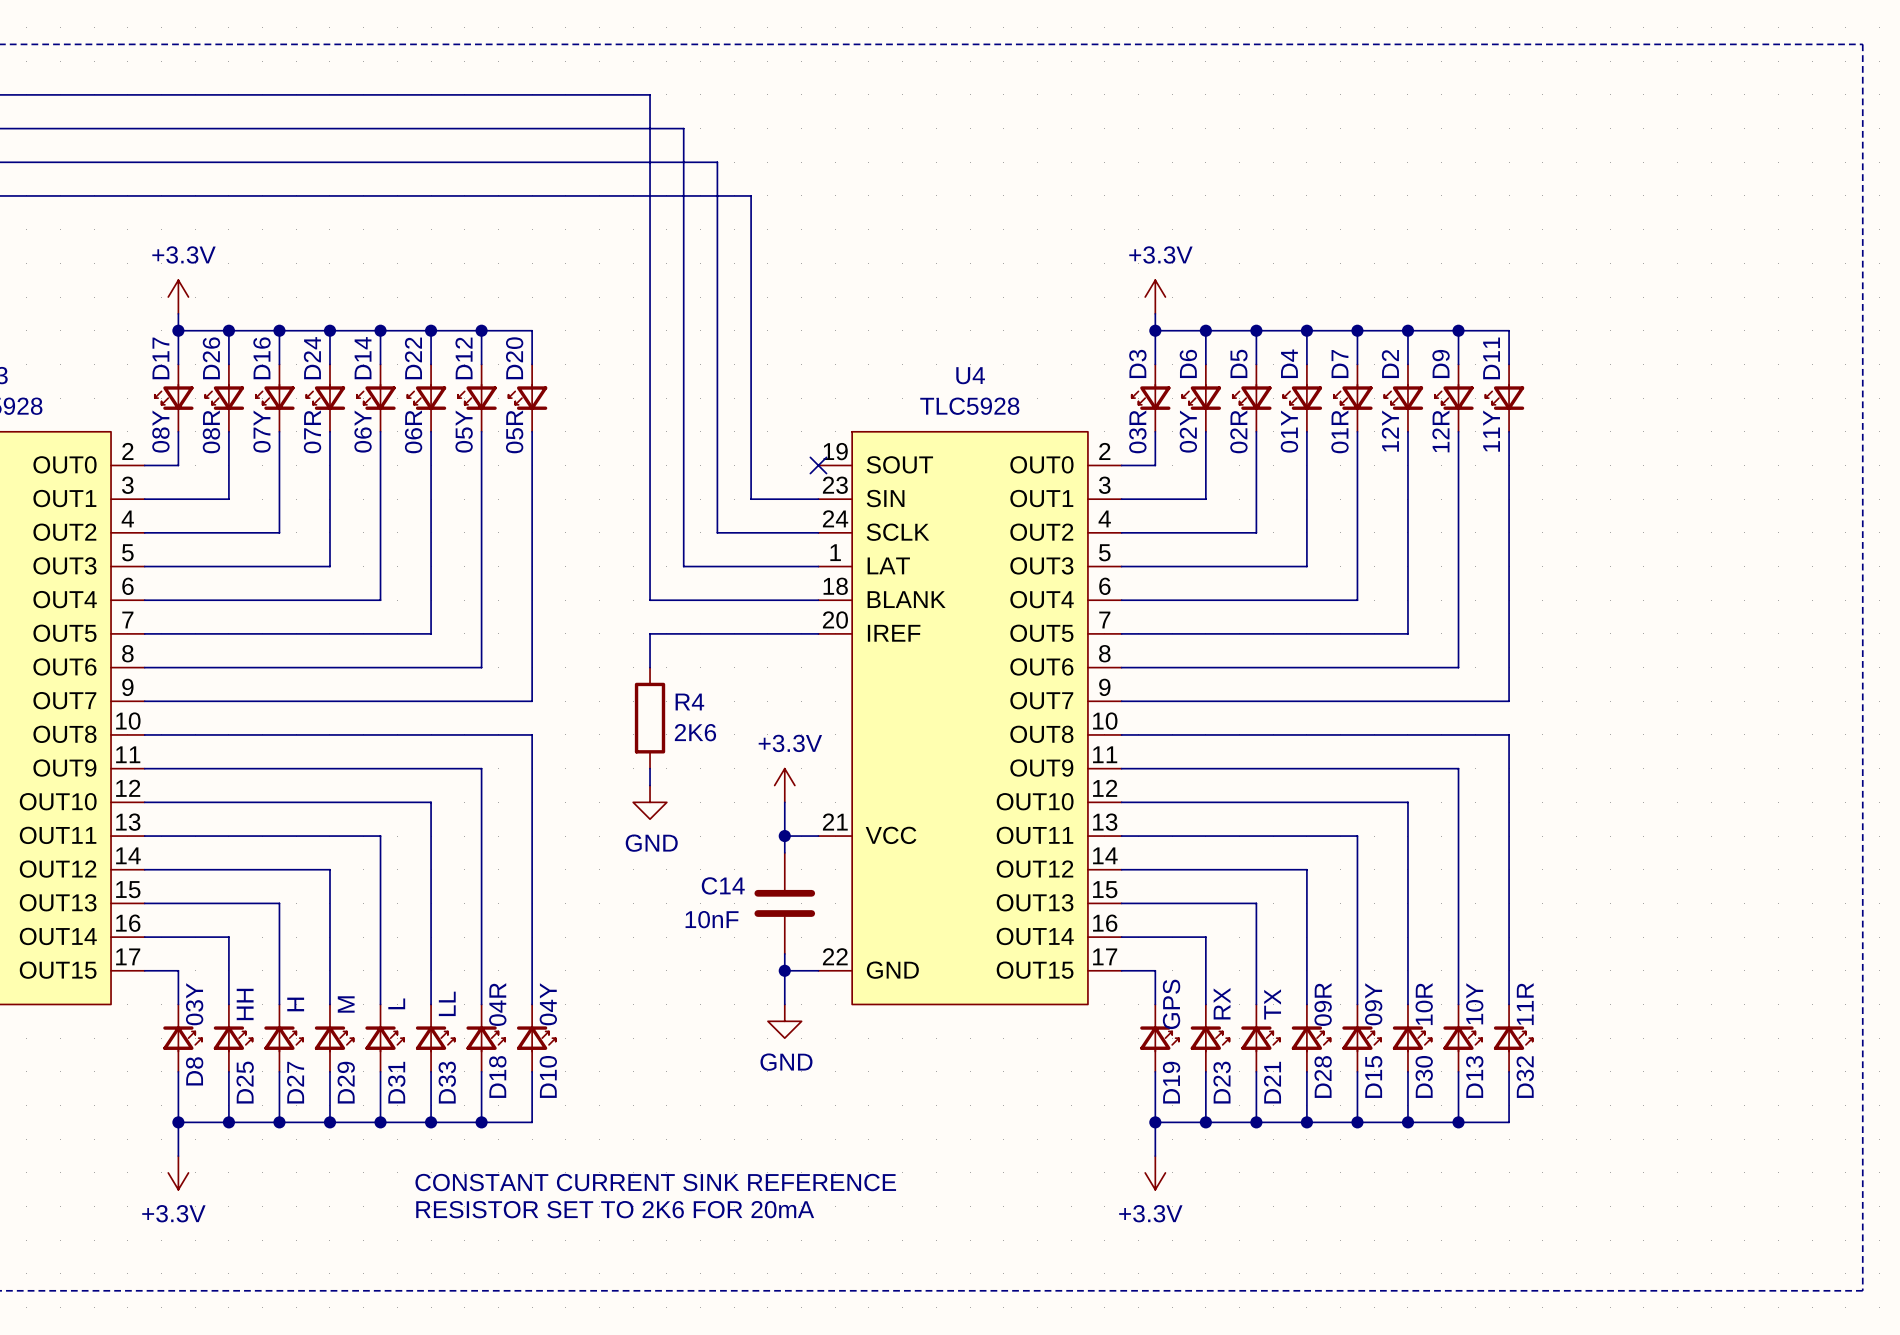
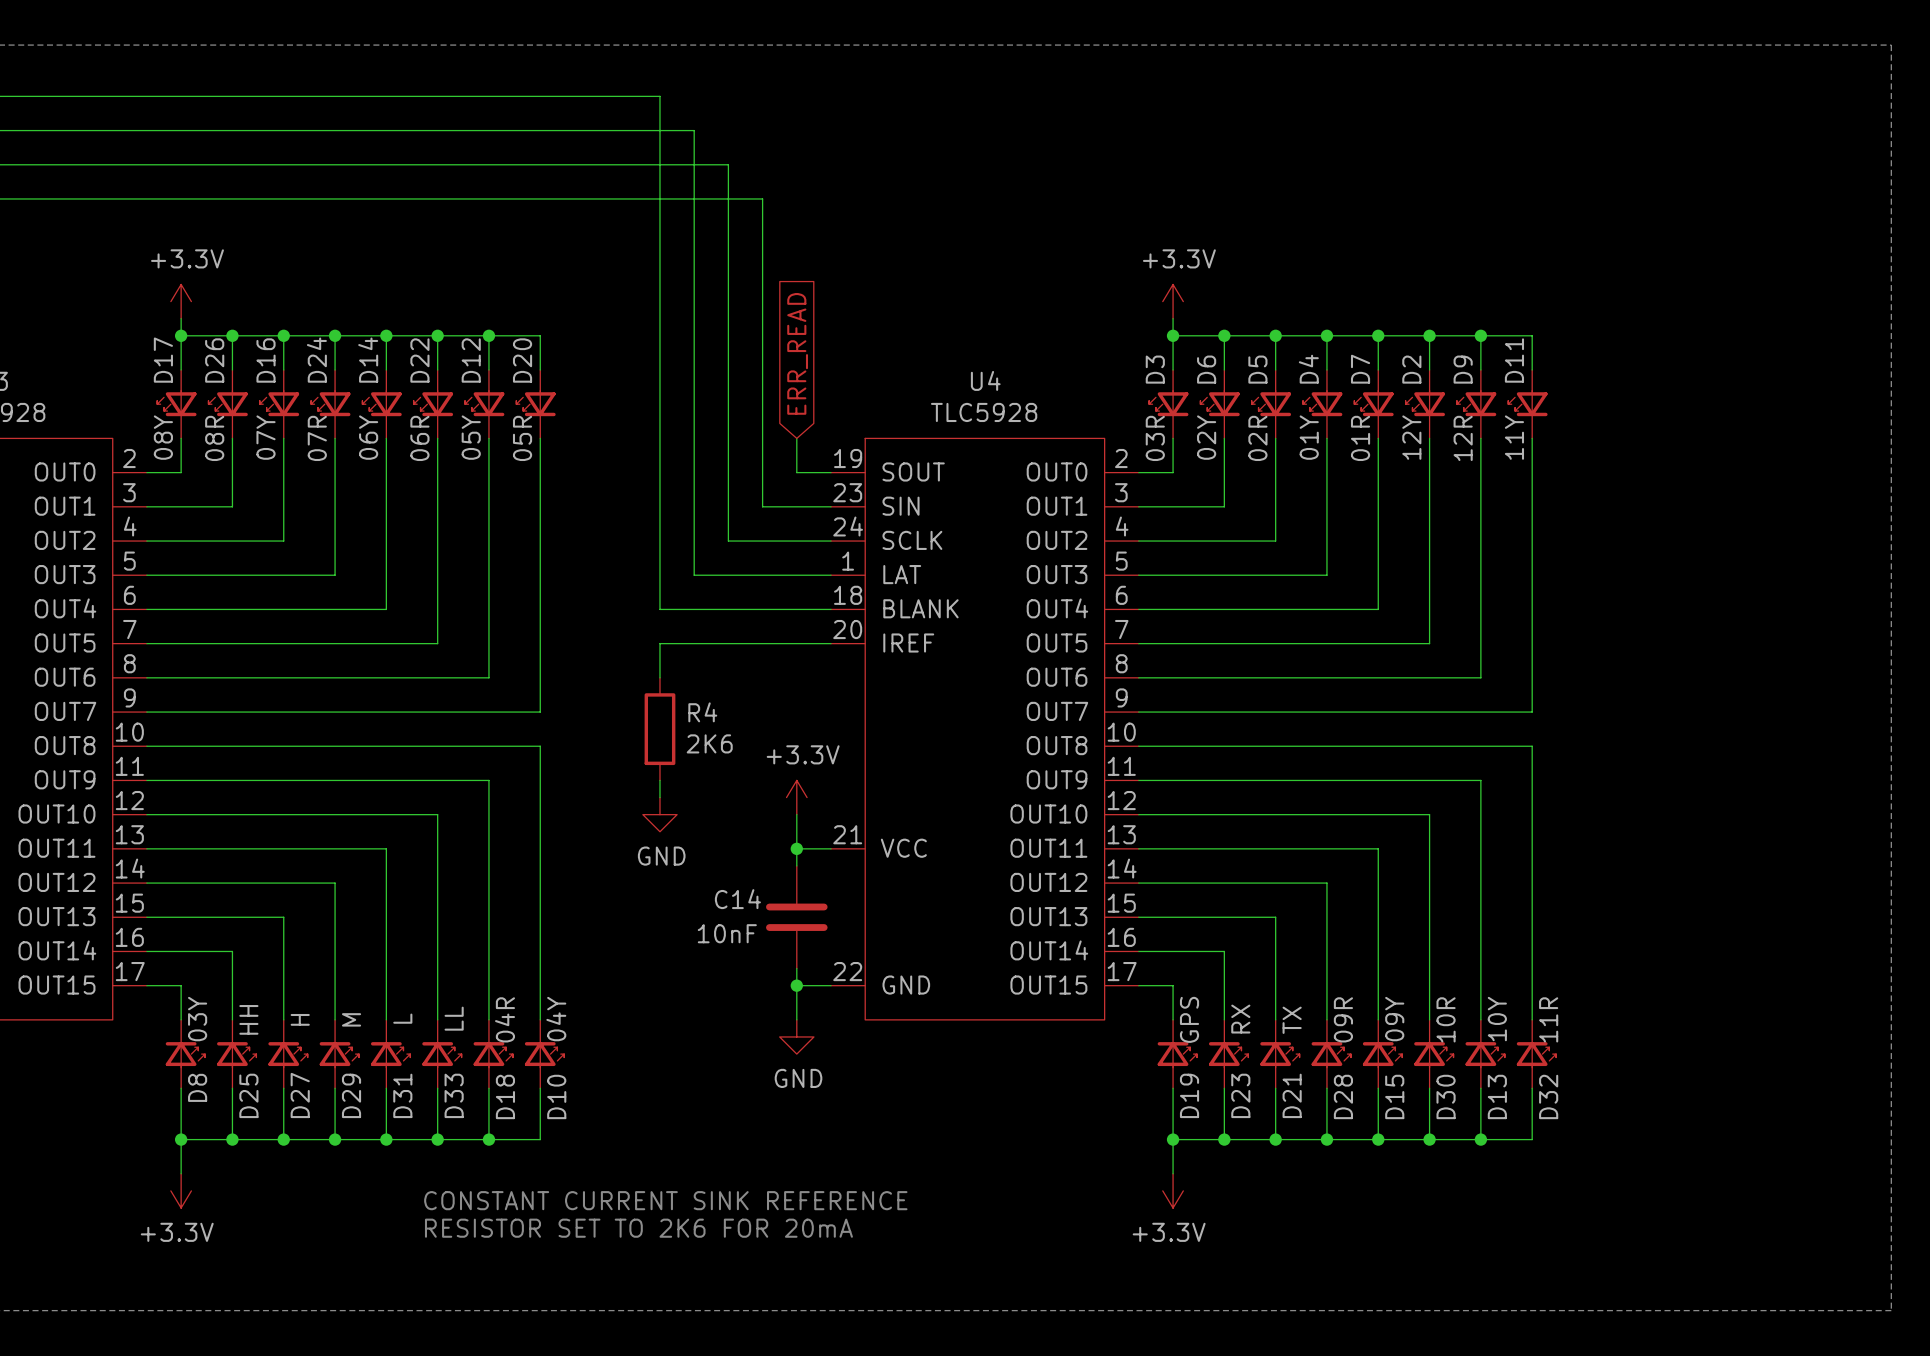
global label: none -> ERR_READ (797, 353)
wire: none -> (796, 438) (796, 472) (831, 472)
no-connect mark: (818, 465) -> none

